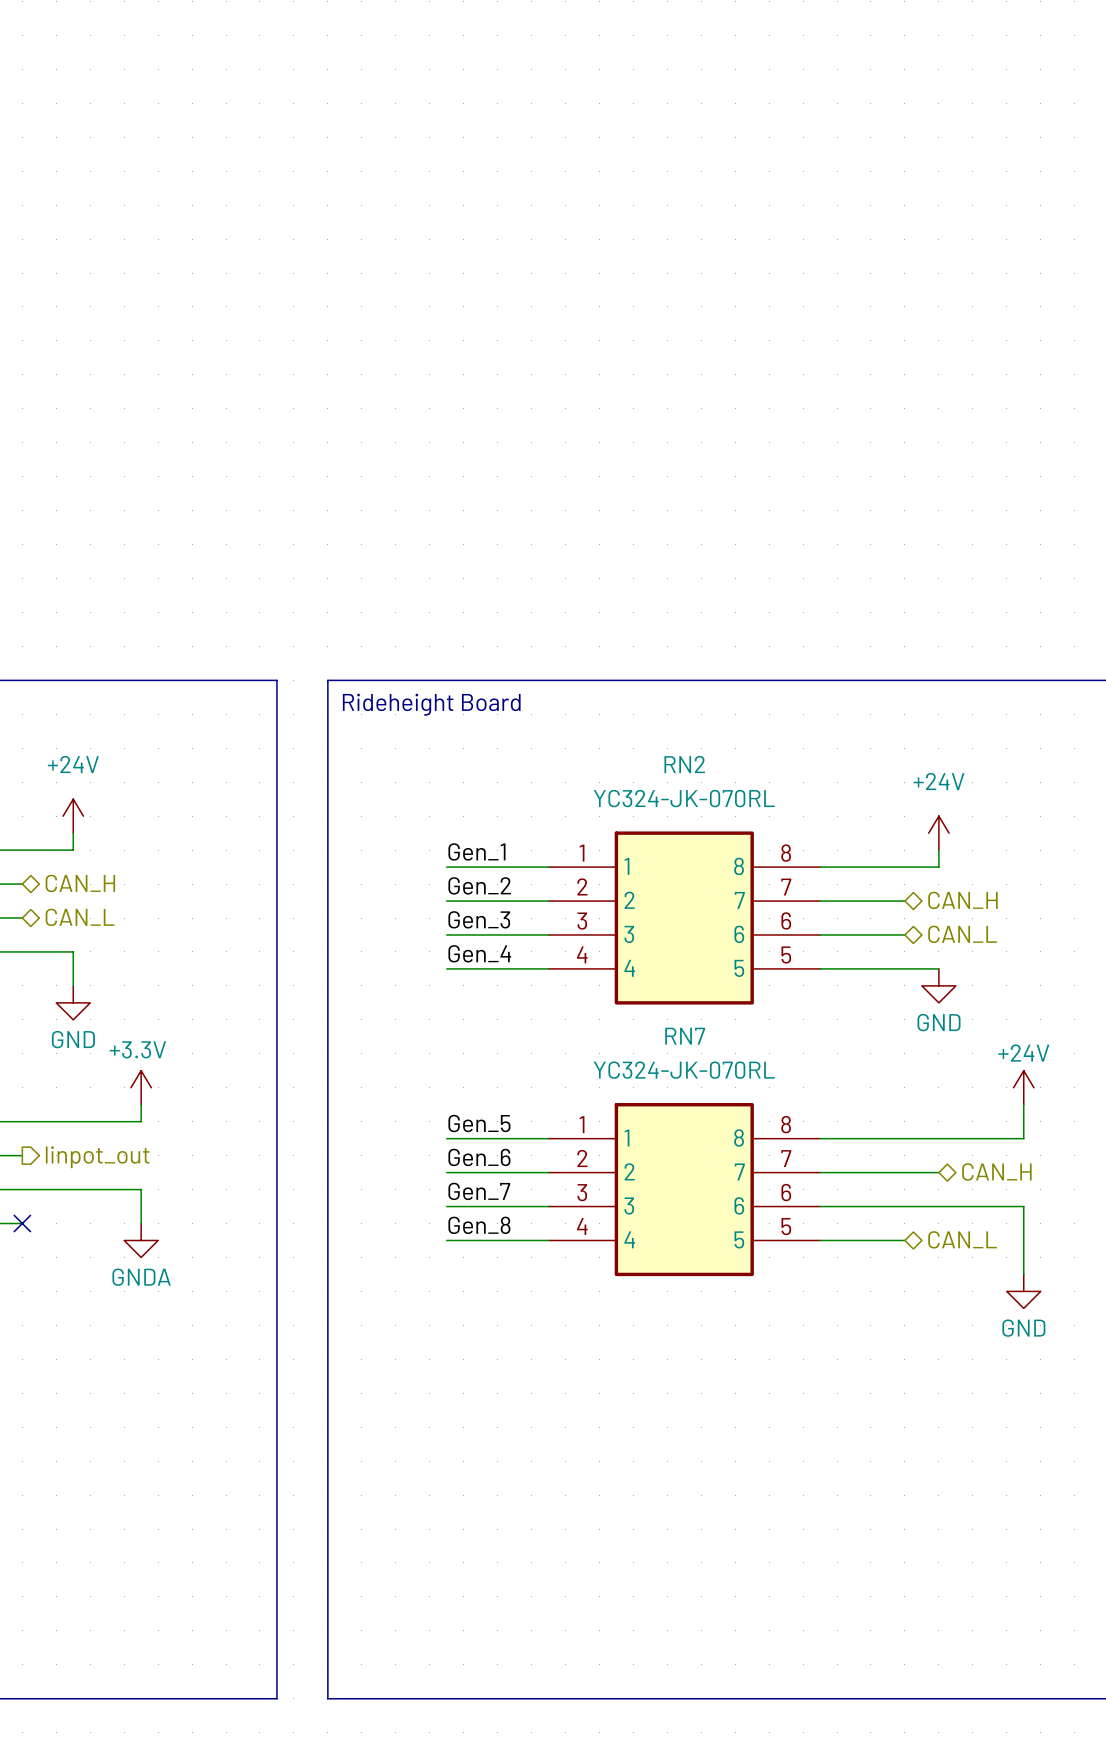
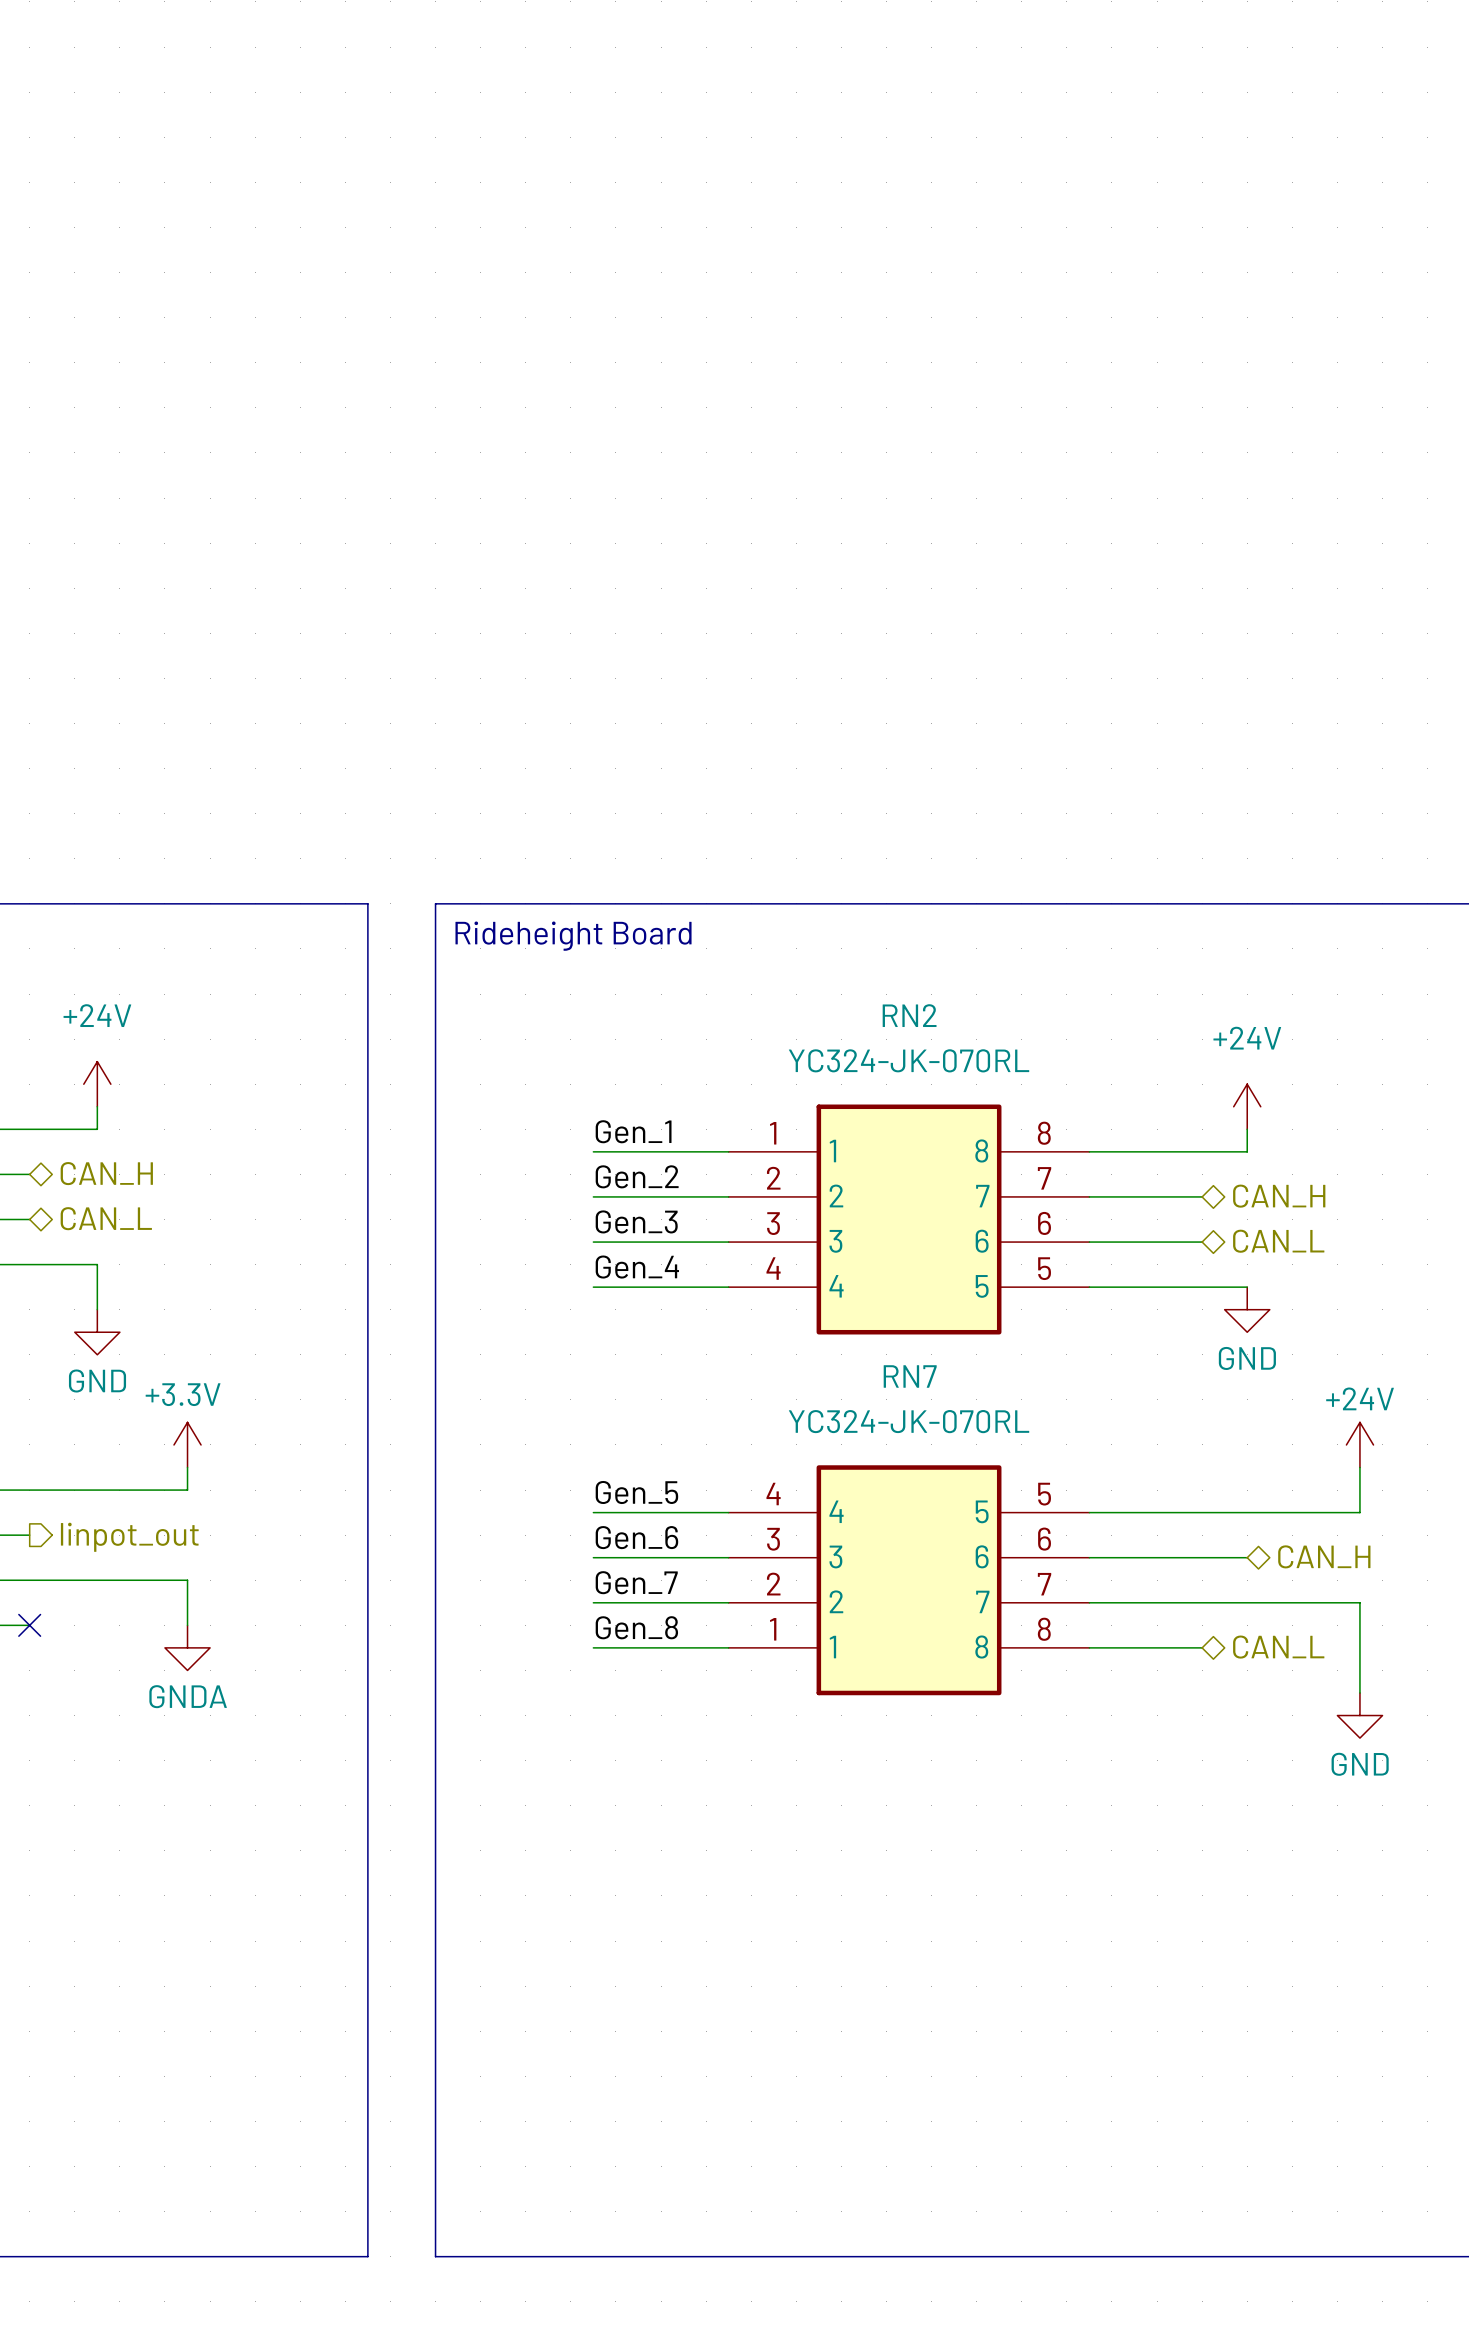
RN7 flip: as is (684, 1189) -> up-down (909, 1580)

